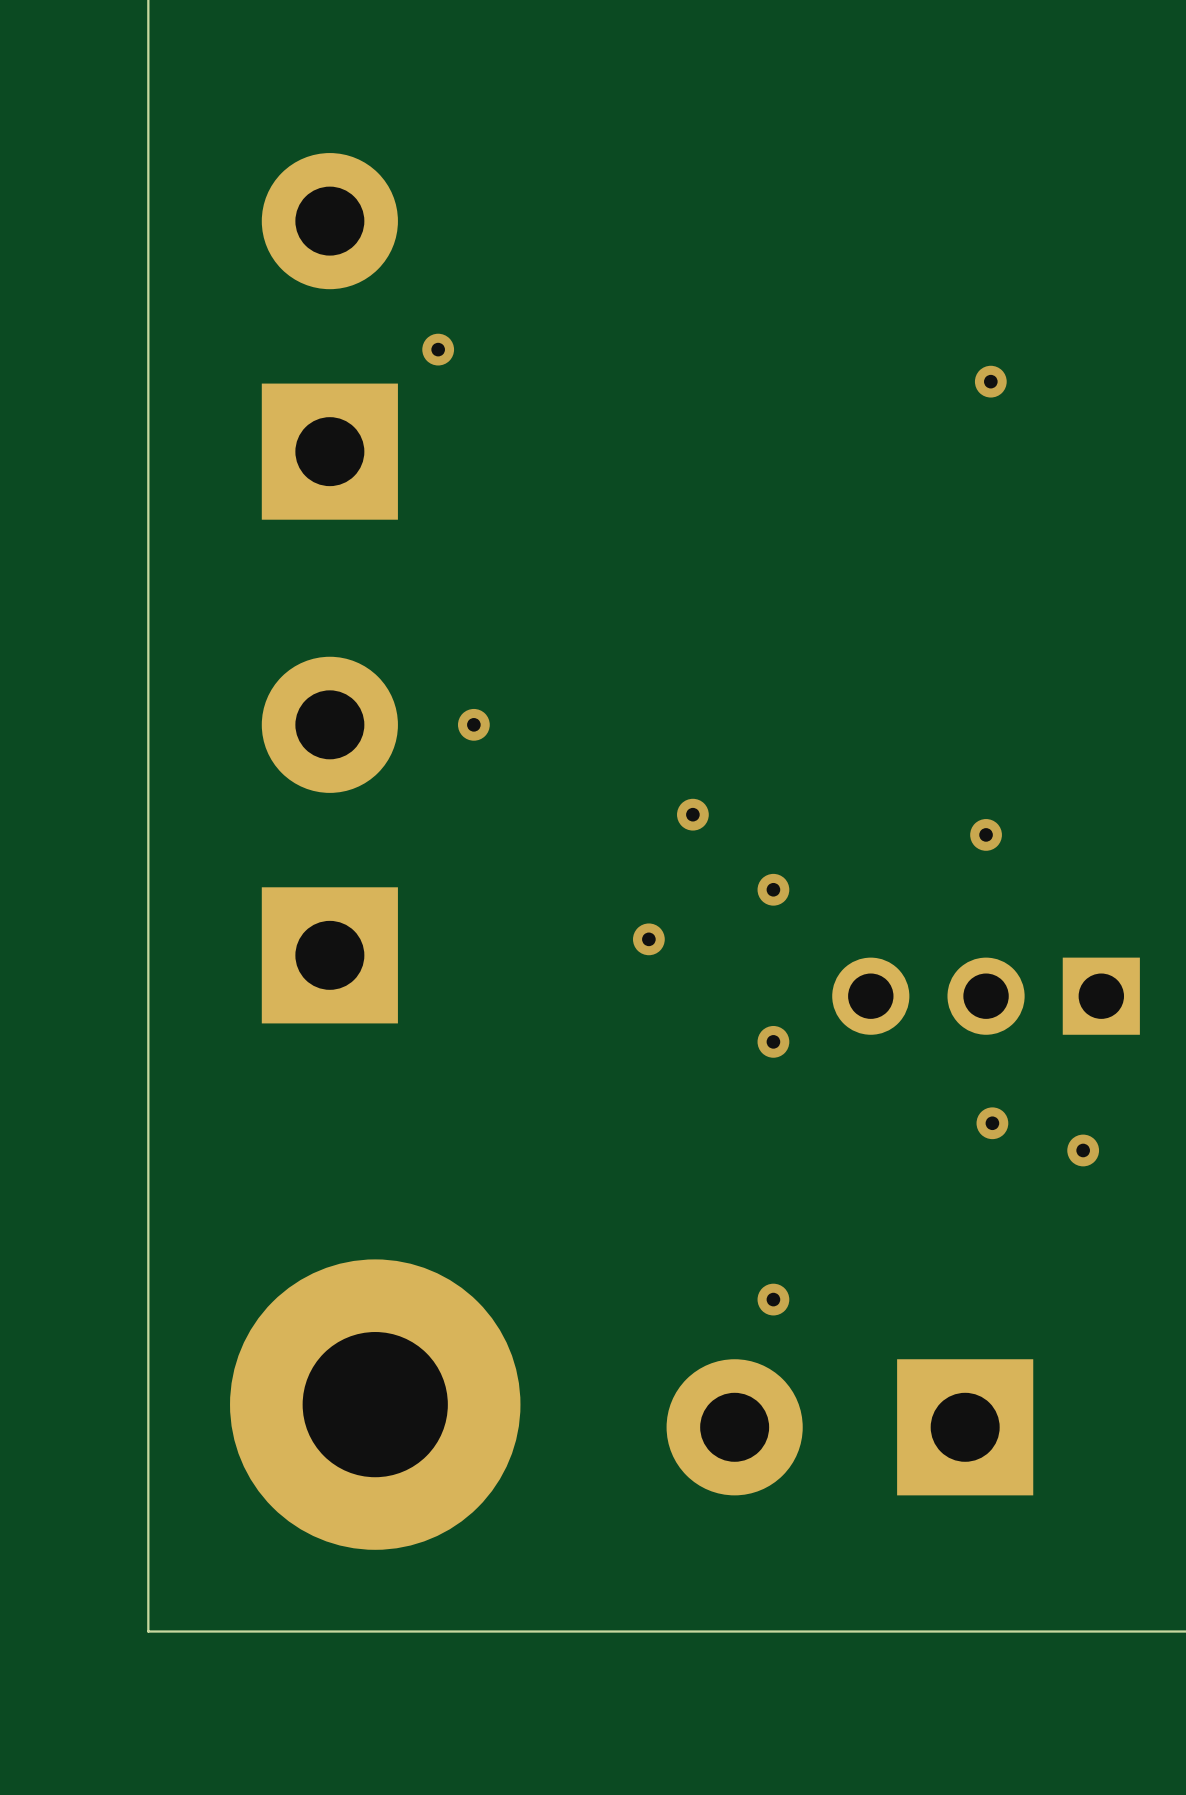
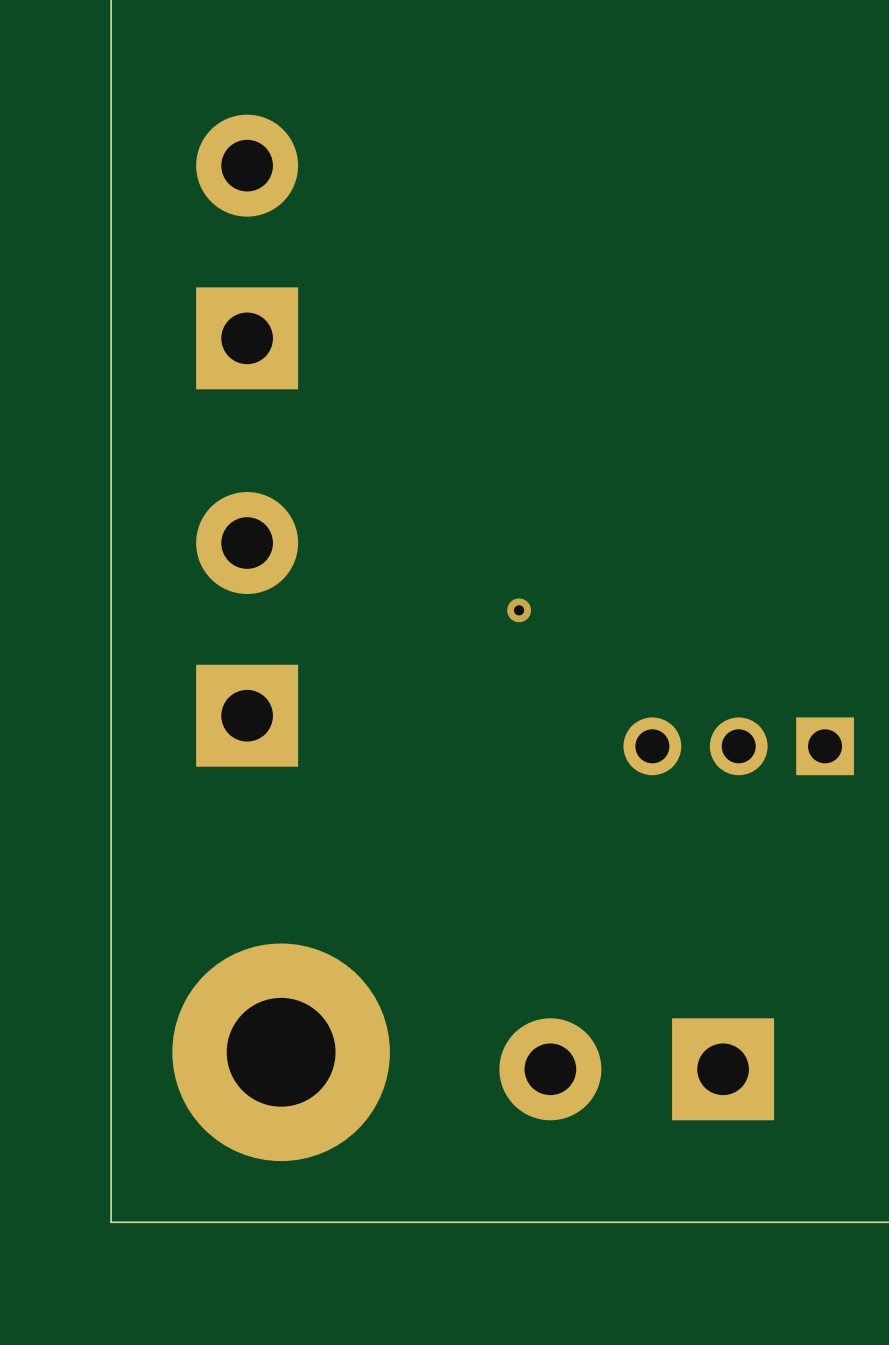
via: (438, 349) -> none
via: (990, 381) -> none
via: (473, 724) -> none
via: (986, 834) -> none
via: (773, 889) -> none
via: (648, 939) -> none
via: (773, 1041) -> none
via: (992, 1123) -> none
via: (1083, 1150) -> none
via: (773, 1299) -> none

